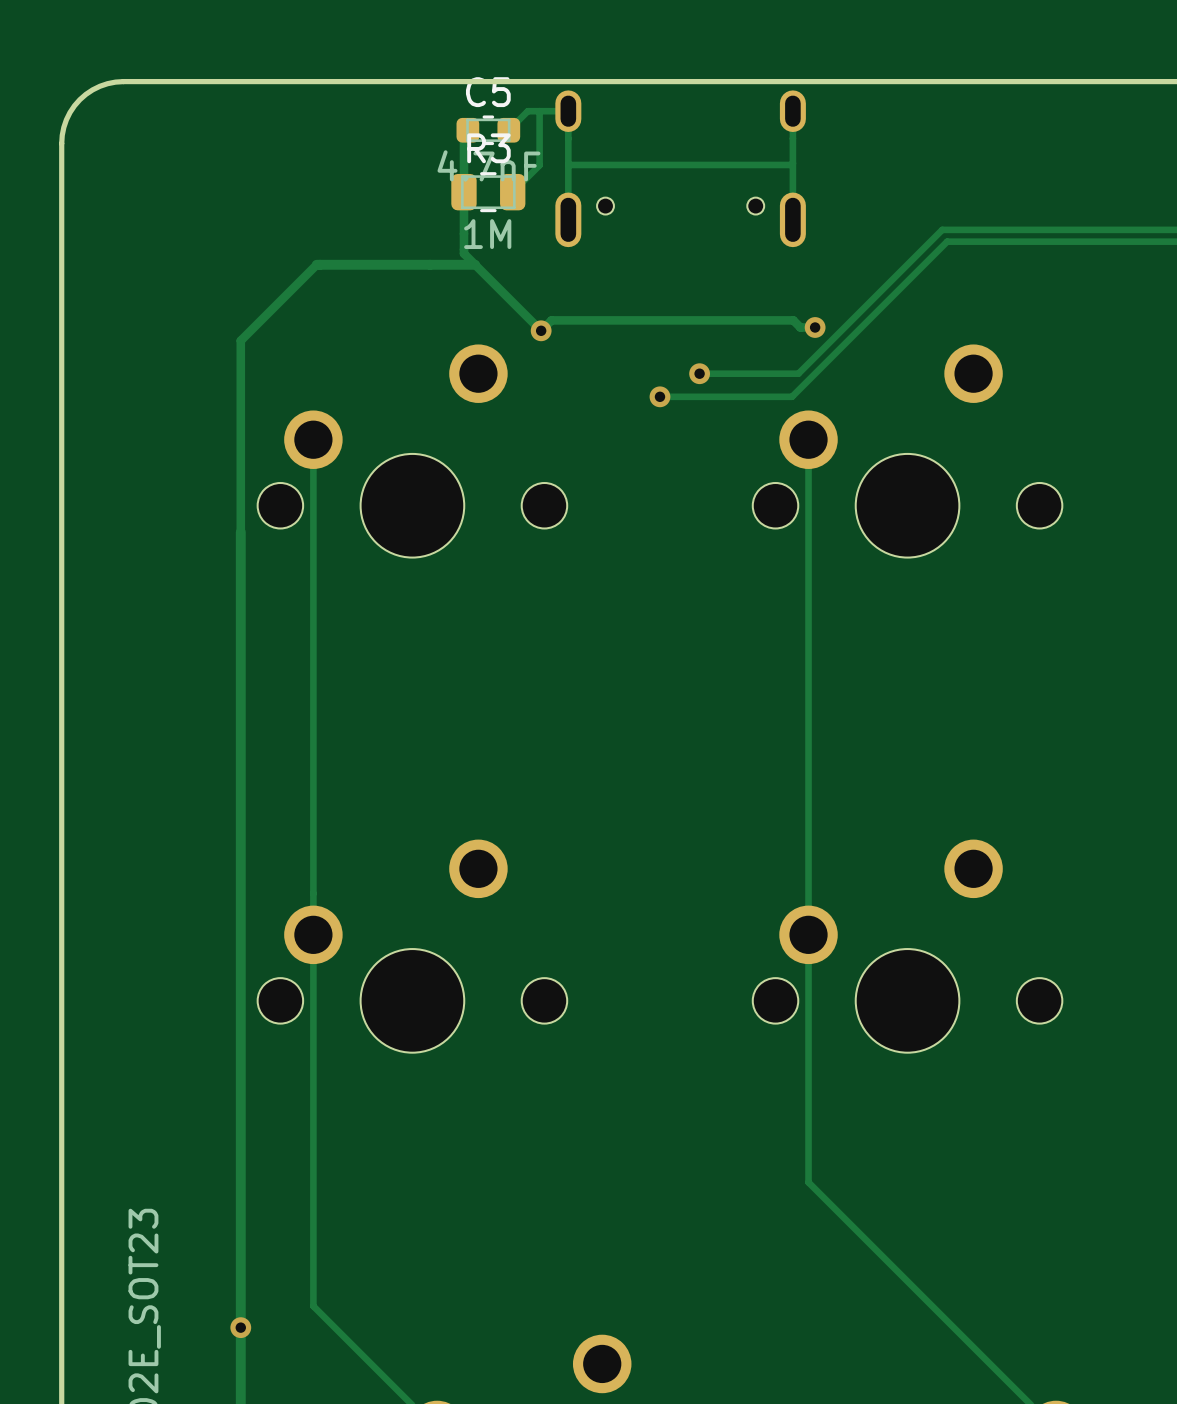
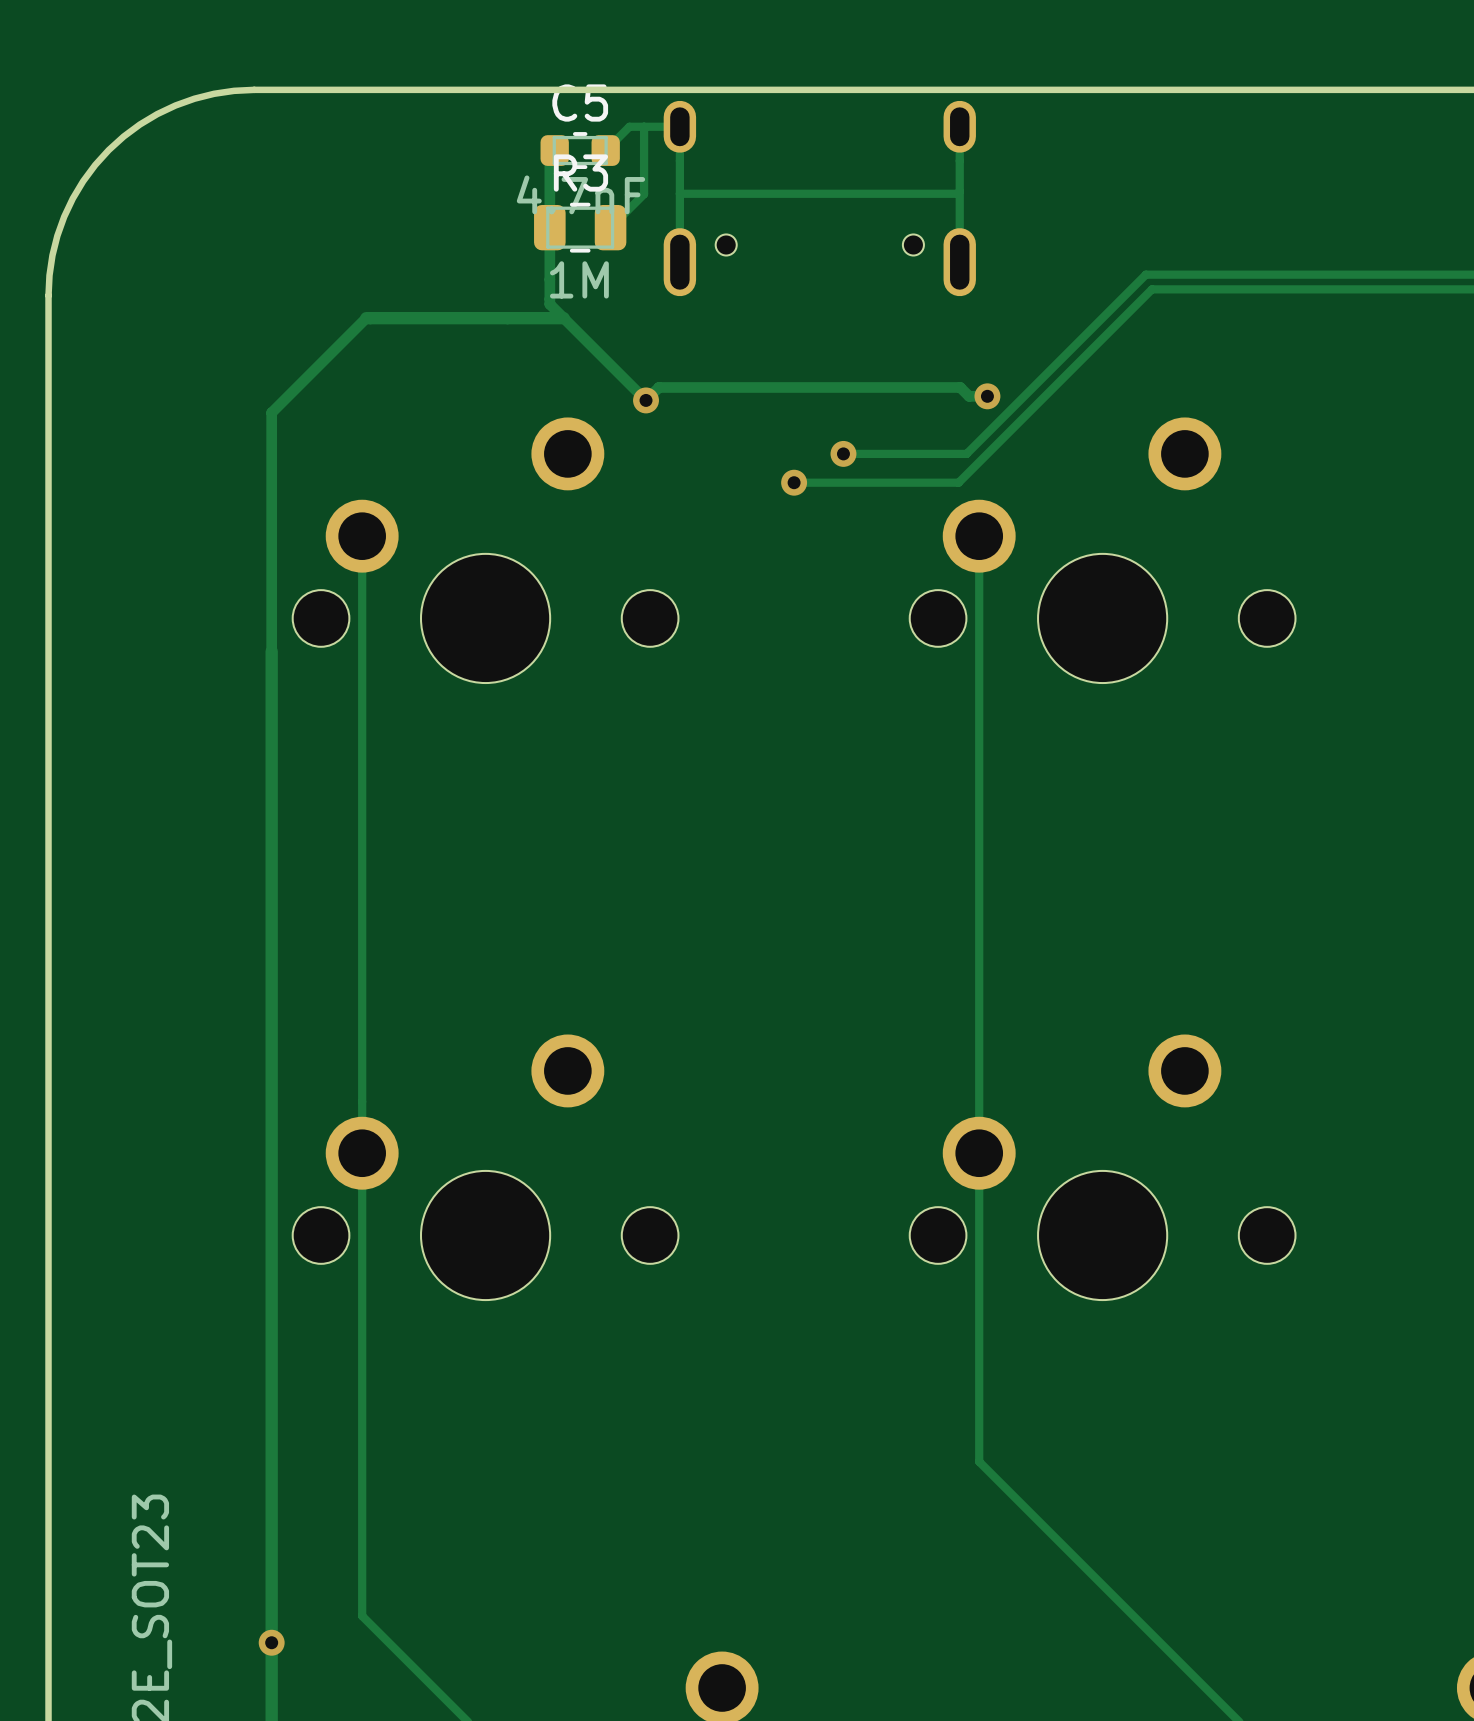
board edge: (226, 81) (115, 82) (99, 86) (79, 99) (66, 119) (62, 135) (61, 246) -> (254, 89) (214, 93) (175, 105) (139, 124) (108, 150) (83, 181) (64, 216) (52, 255) (48, 295)

